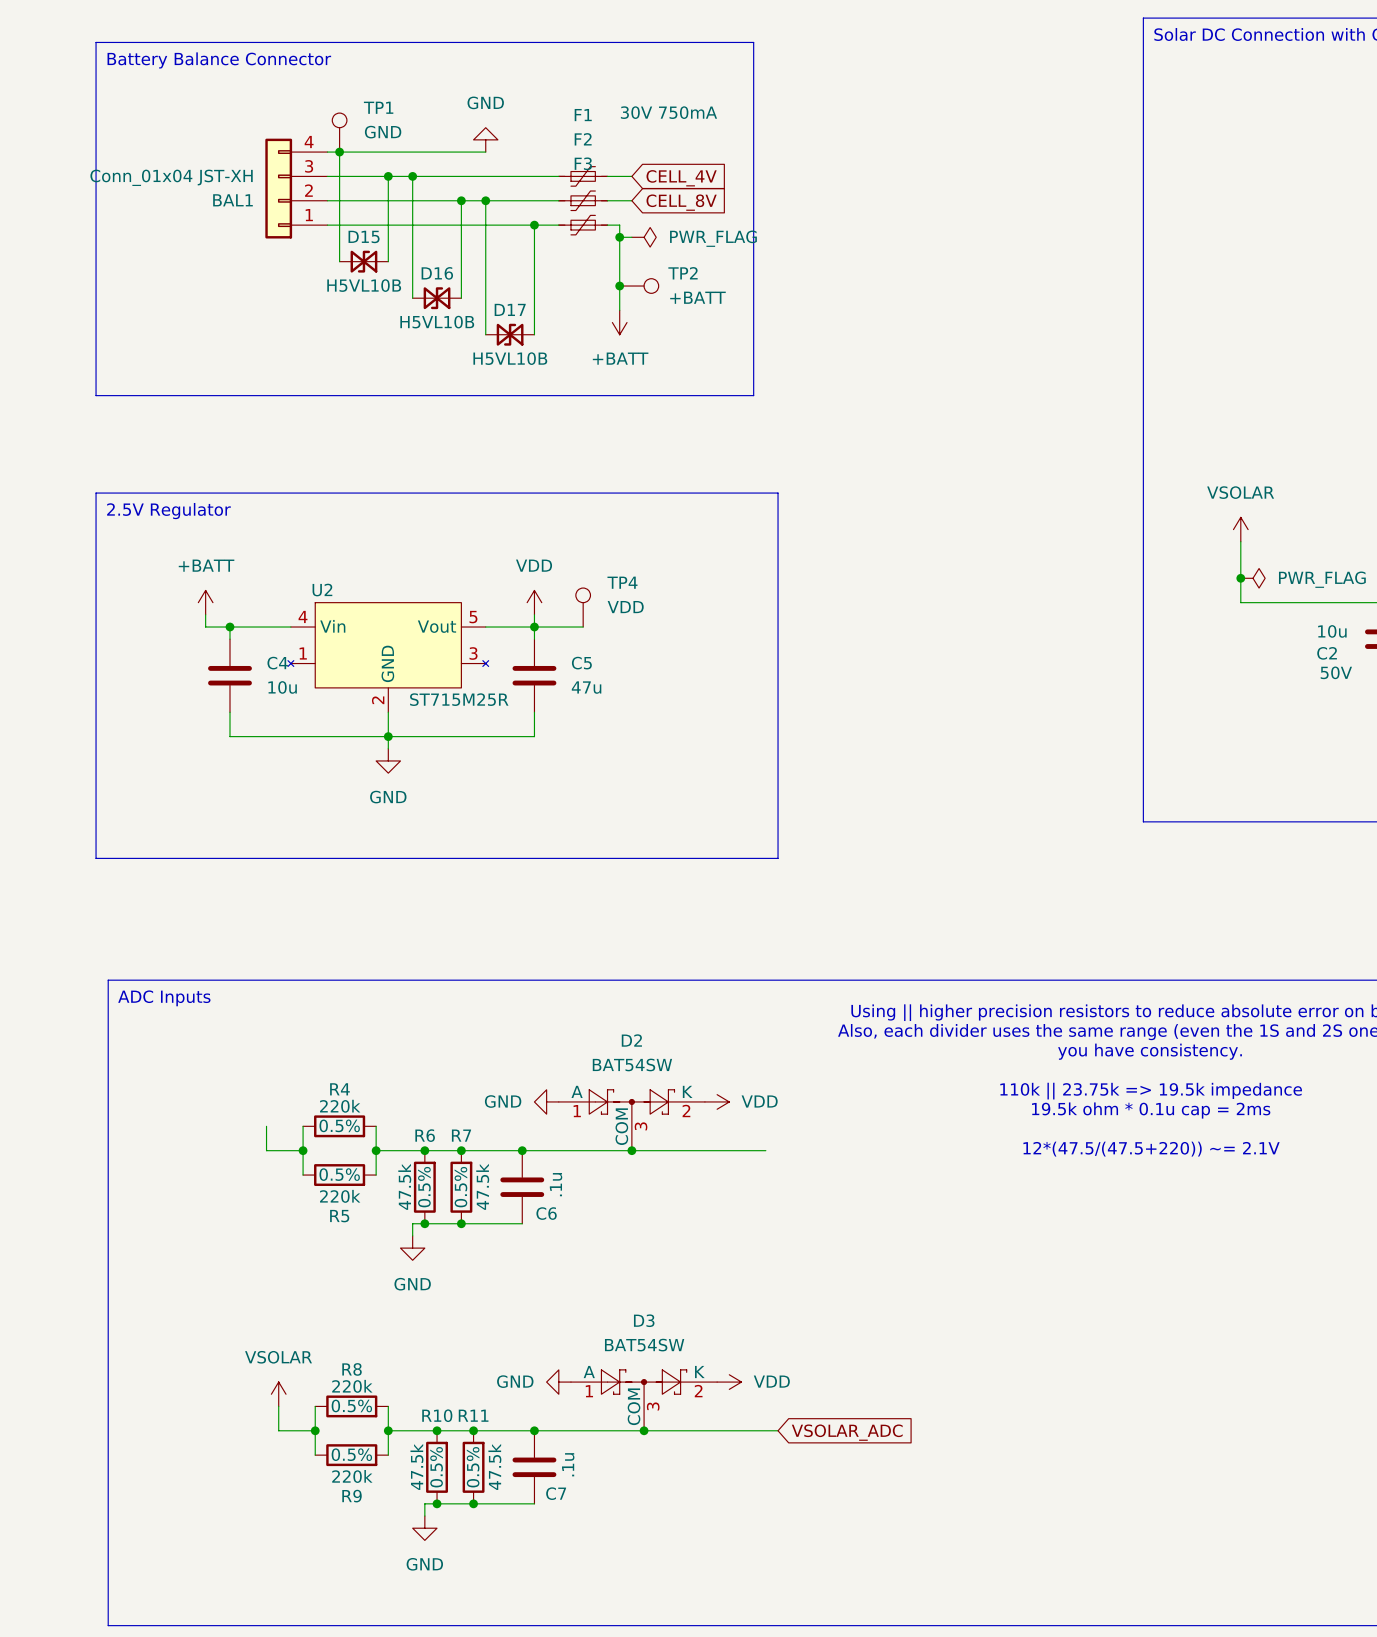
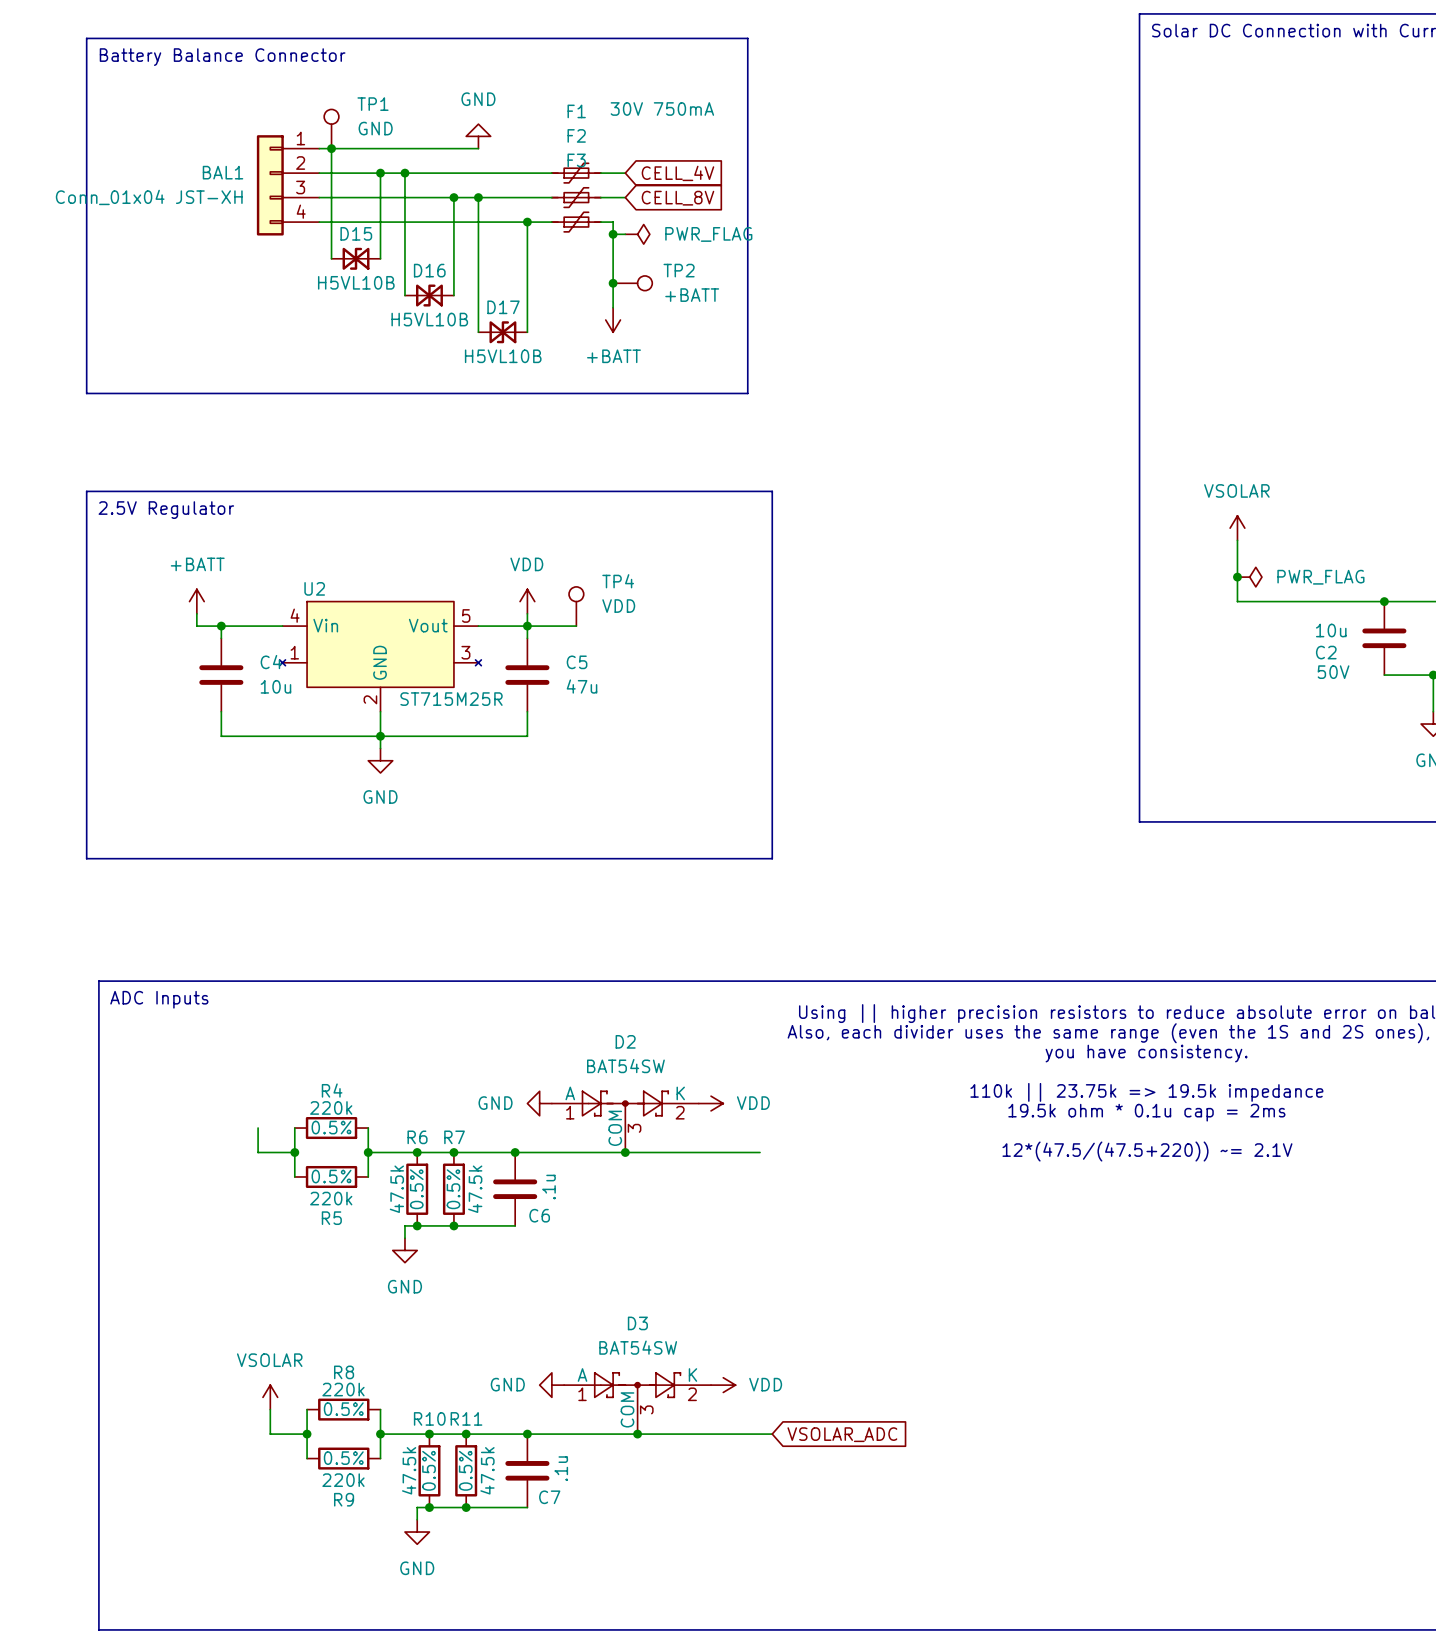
BAL1 flip: as is (278, 188) -> up-down (270, 185)

